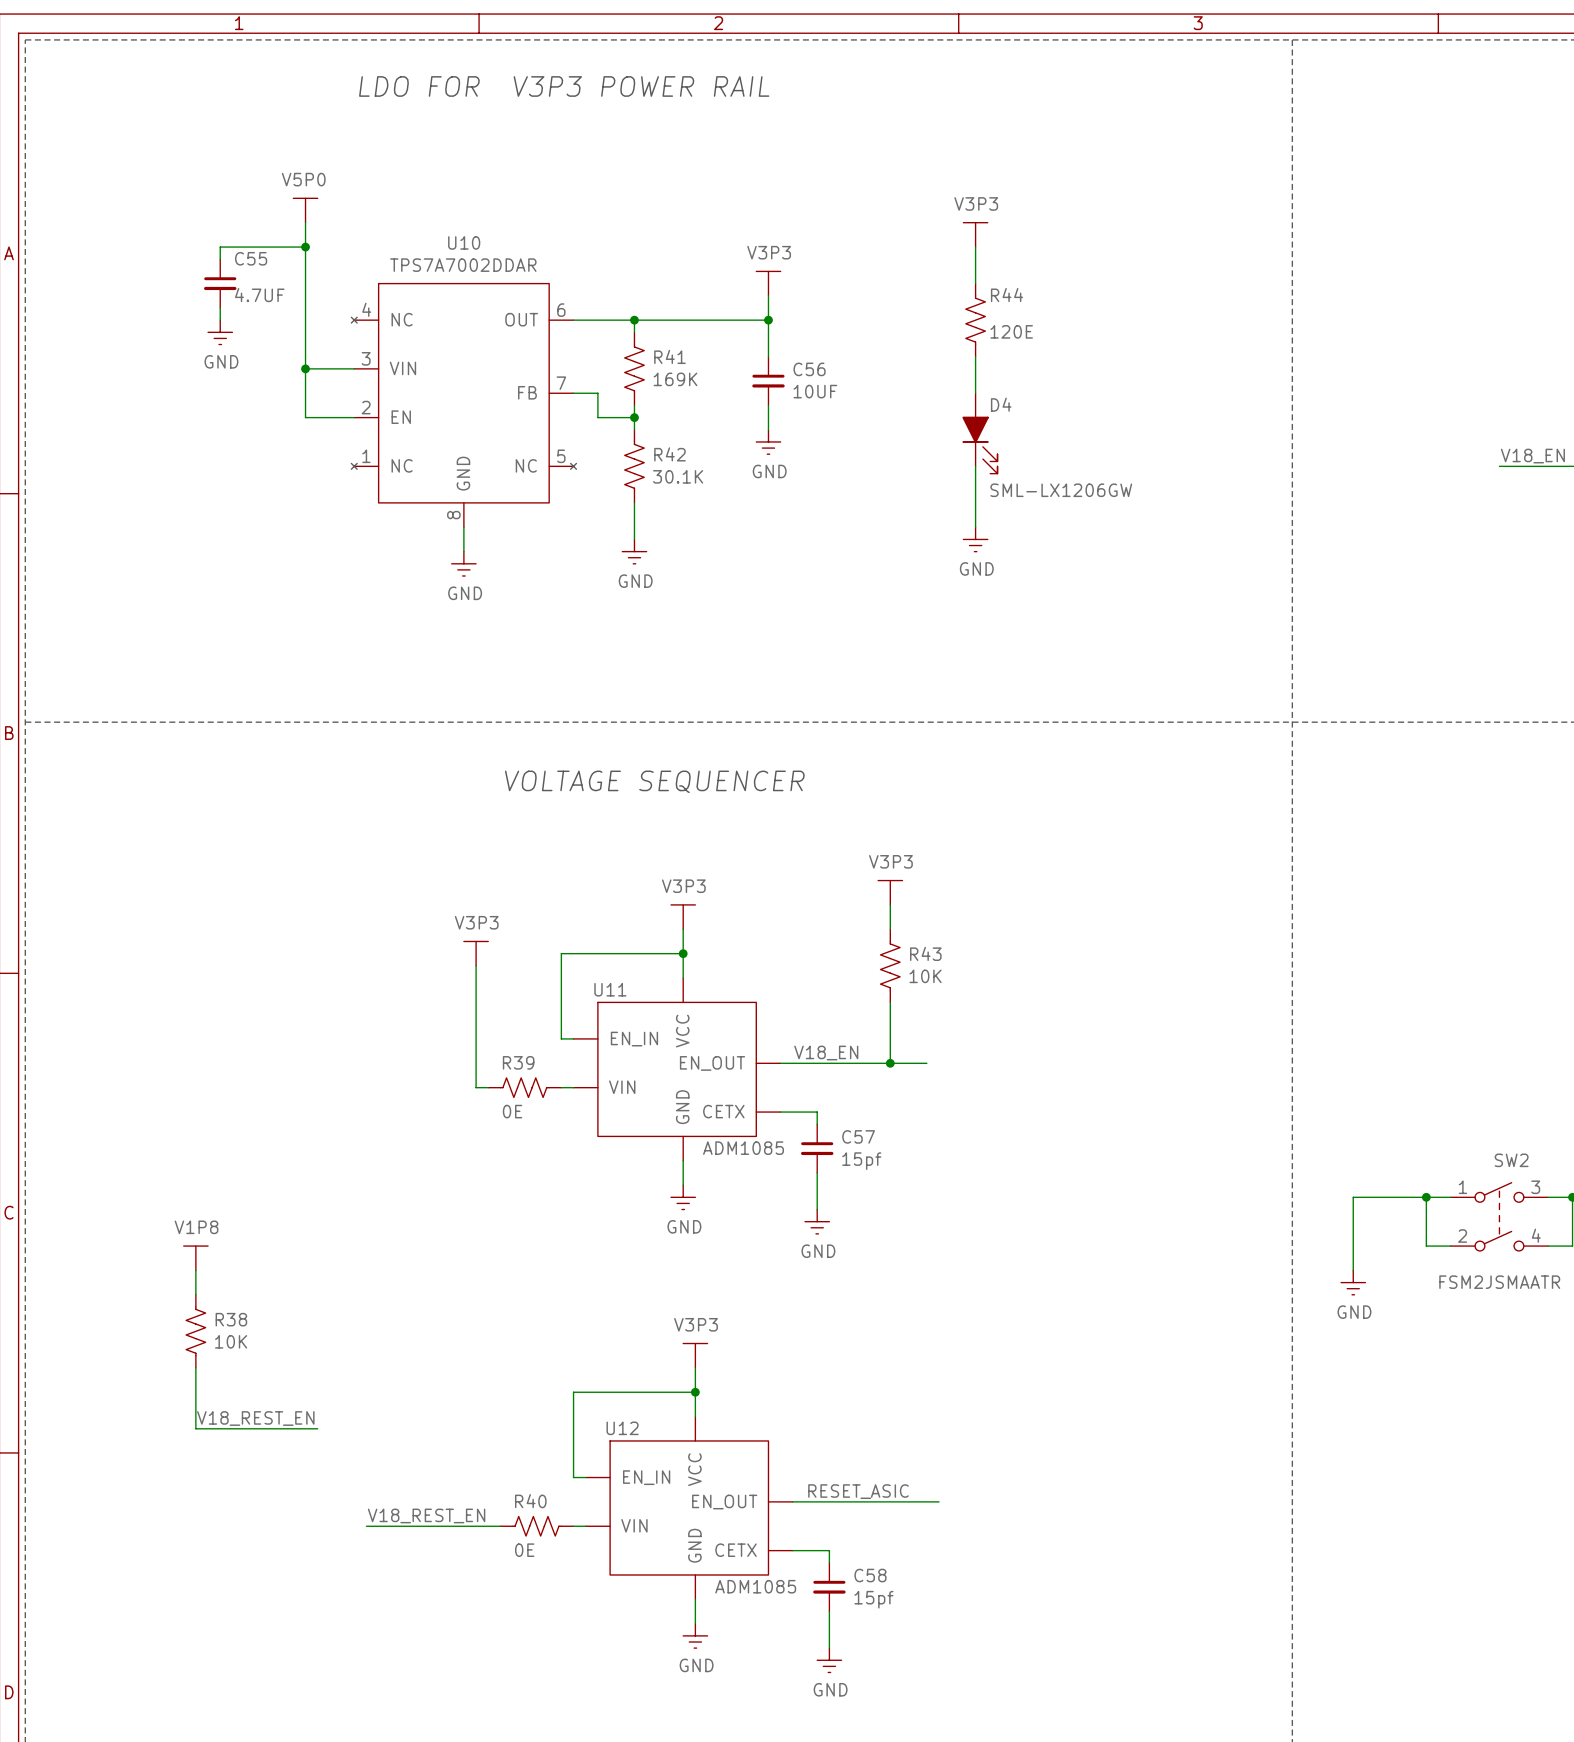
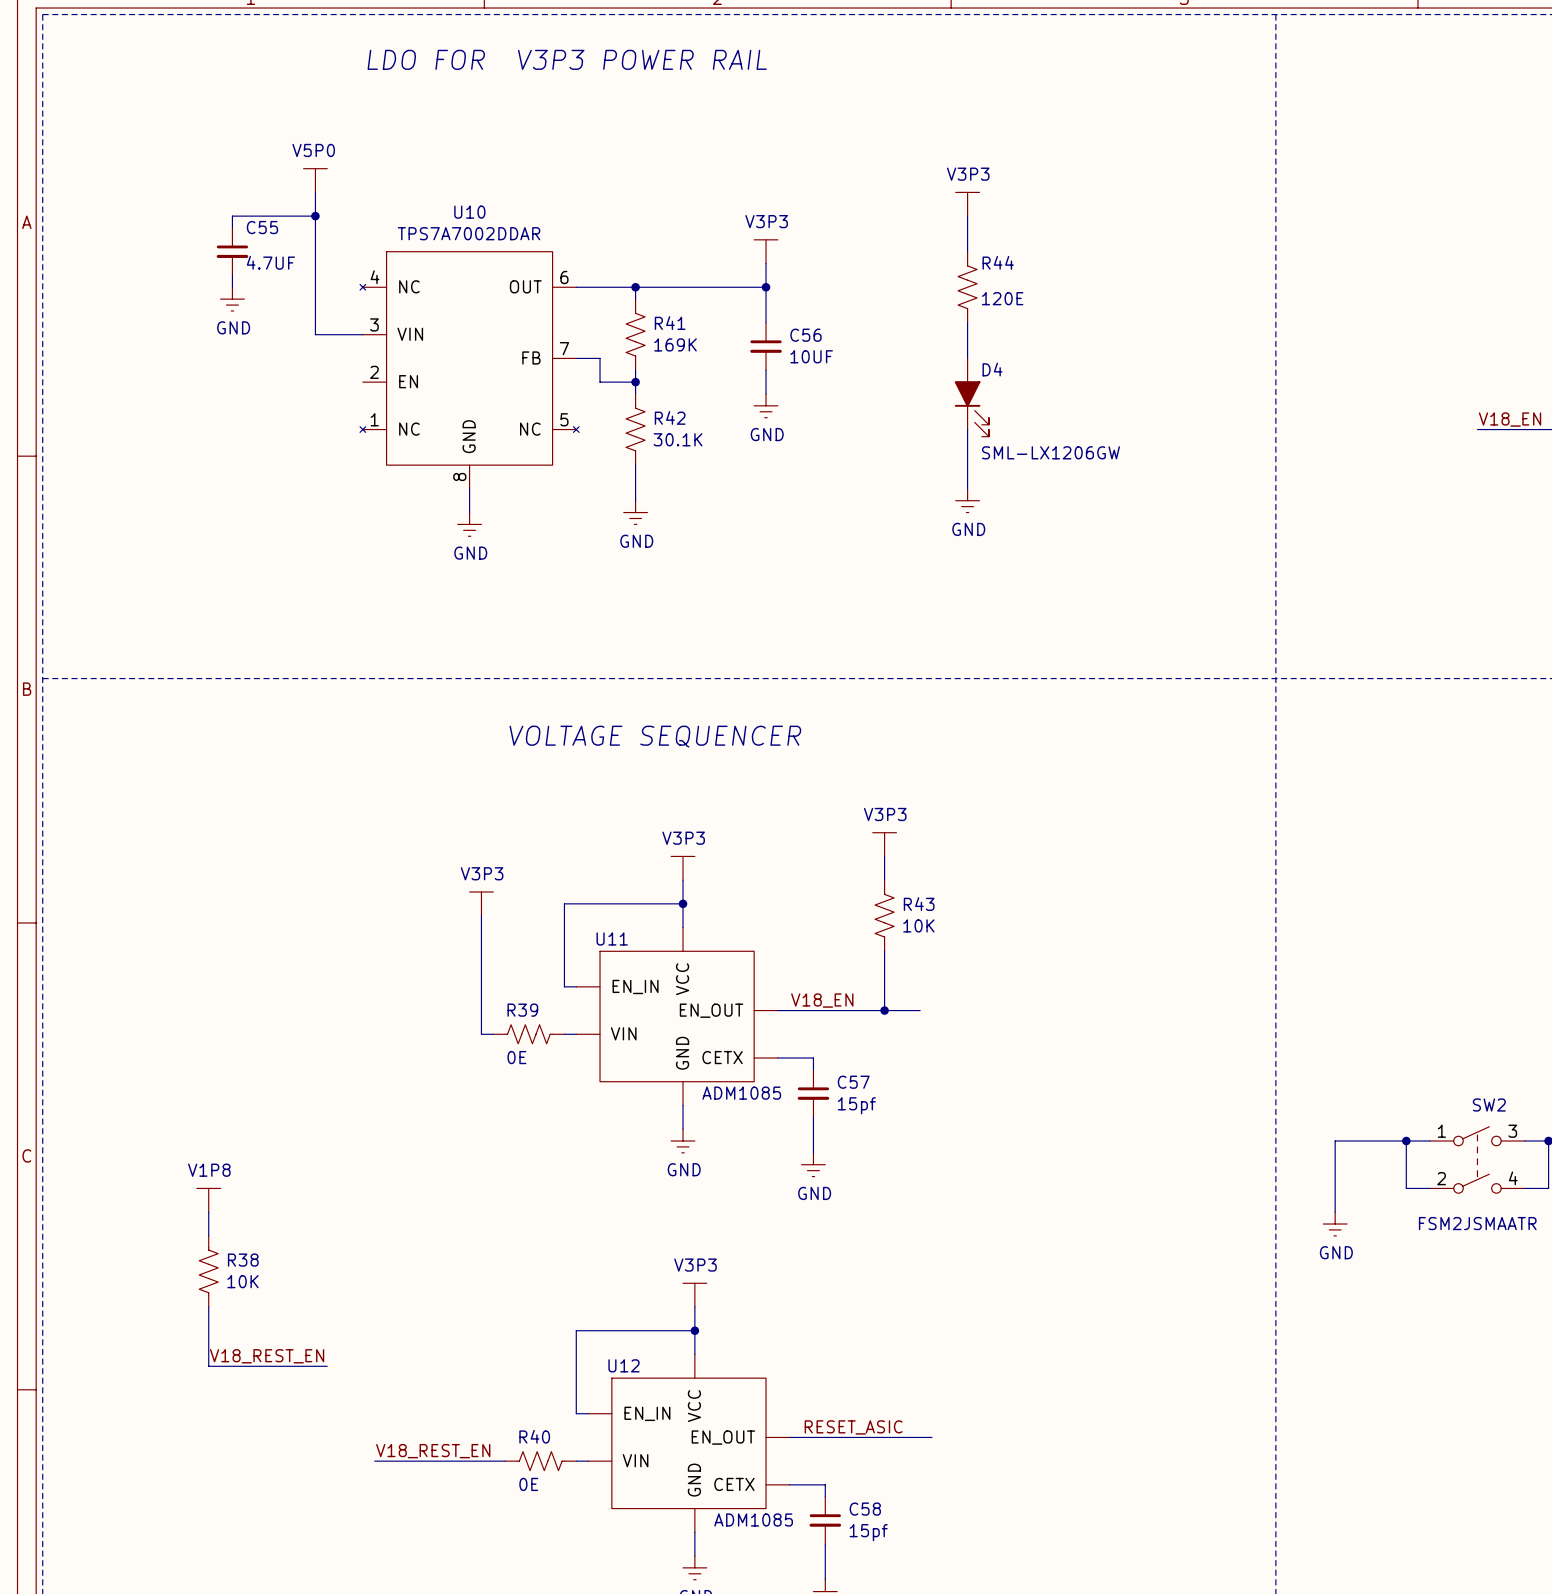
wire: (305, 368) (305, 417) (354, 417) -> none
junction: (305, 368) -> none

